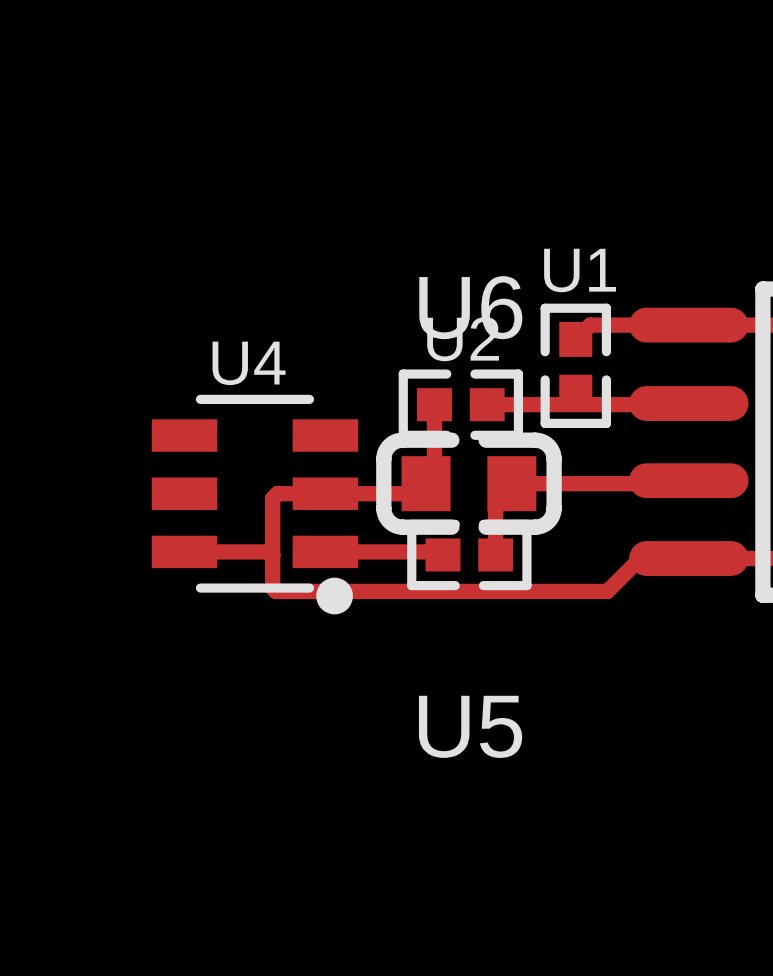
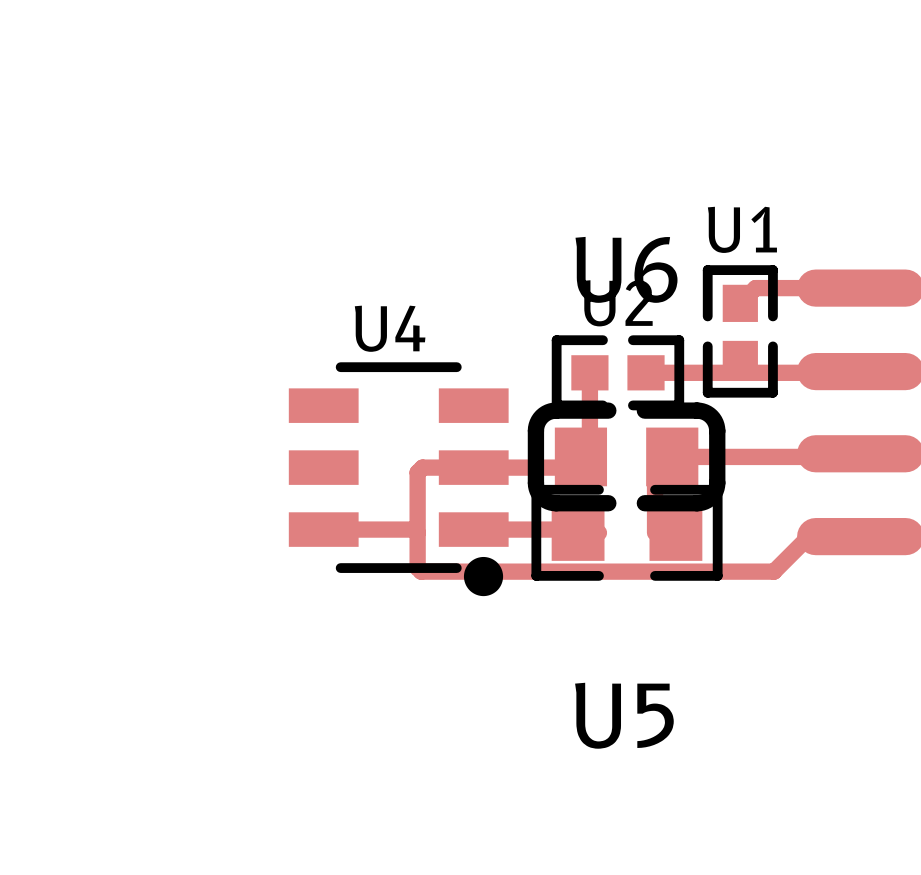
U6 footprint: [407, 519, 532, 591] -> [531, 484, 723, 581]

